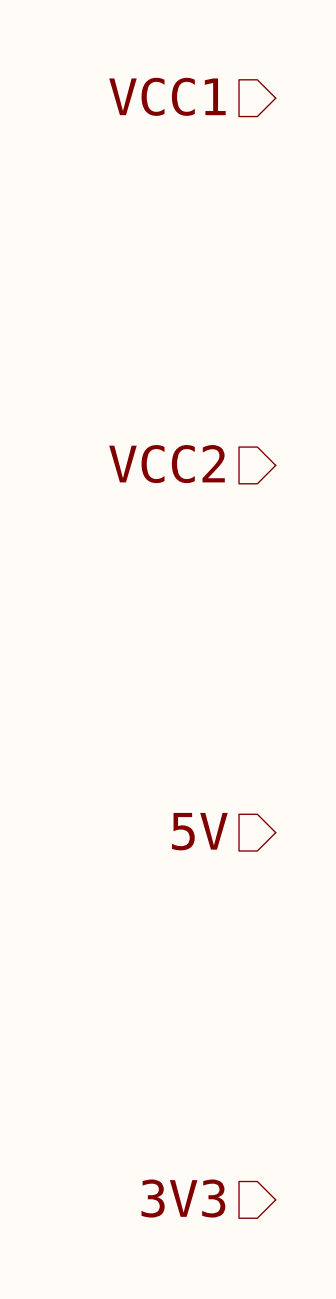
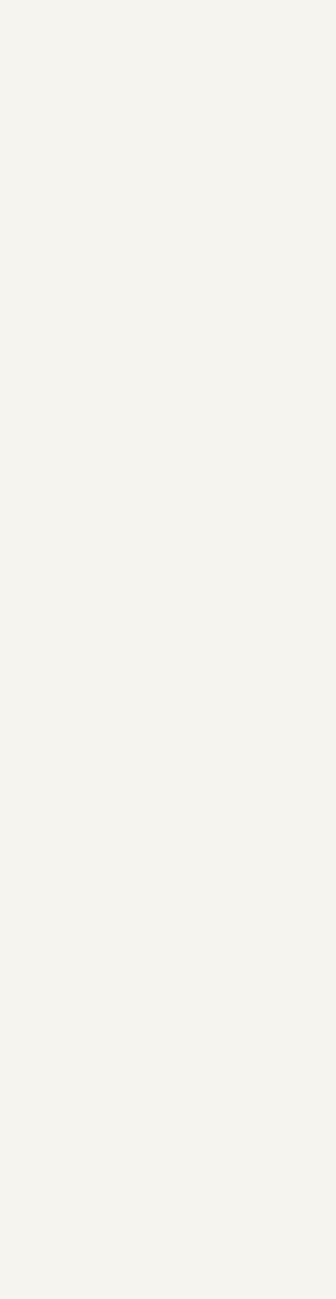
hierarchical label: VCC1 (167, 96) -> none
hierarchical label: VCC2 (167, 464) -> none
hierarchical label: 5V (199, 831) -> none
hierarchical label: 3V3 (183, 1198) -> none

